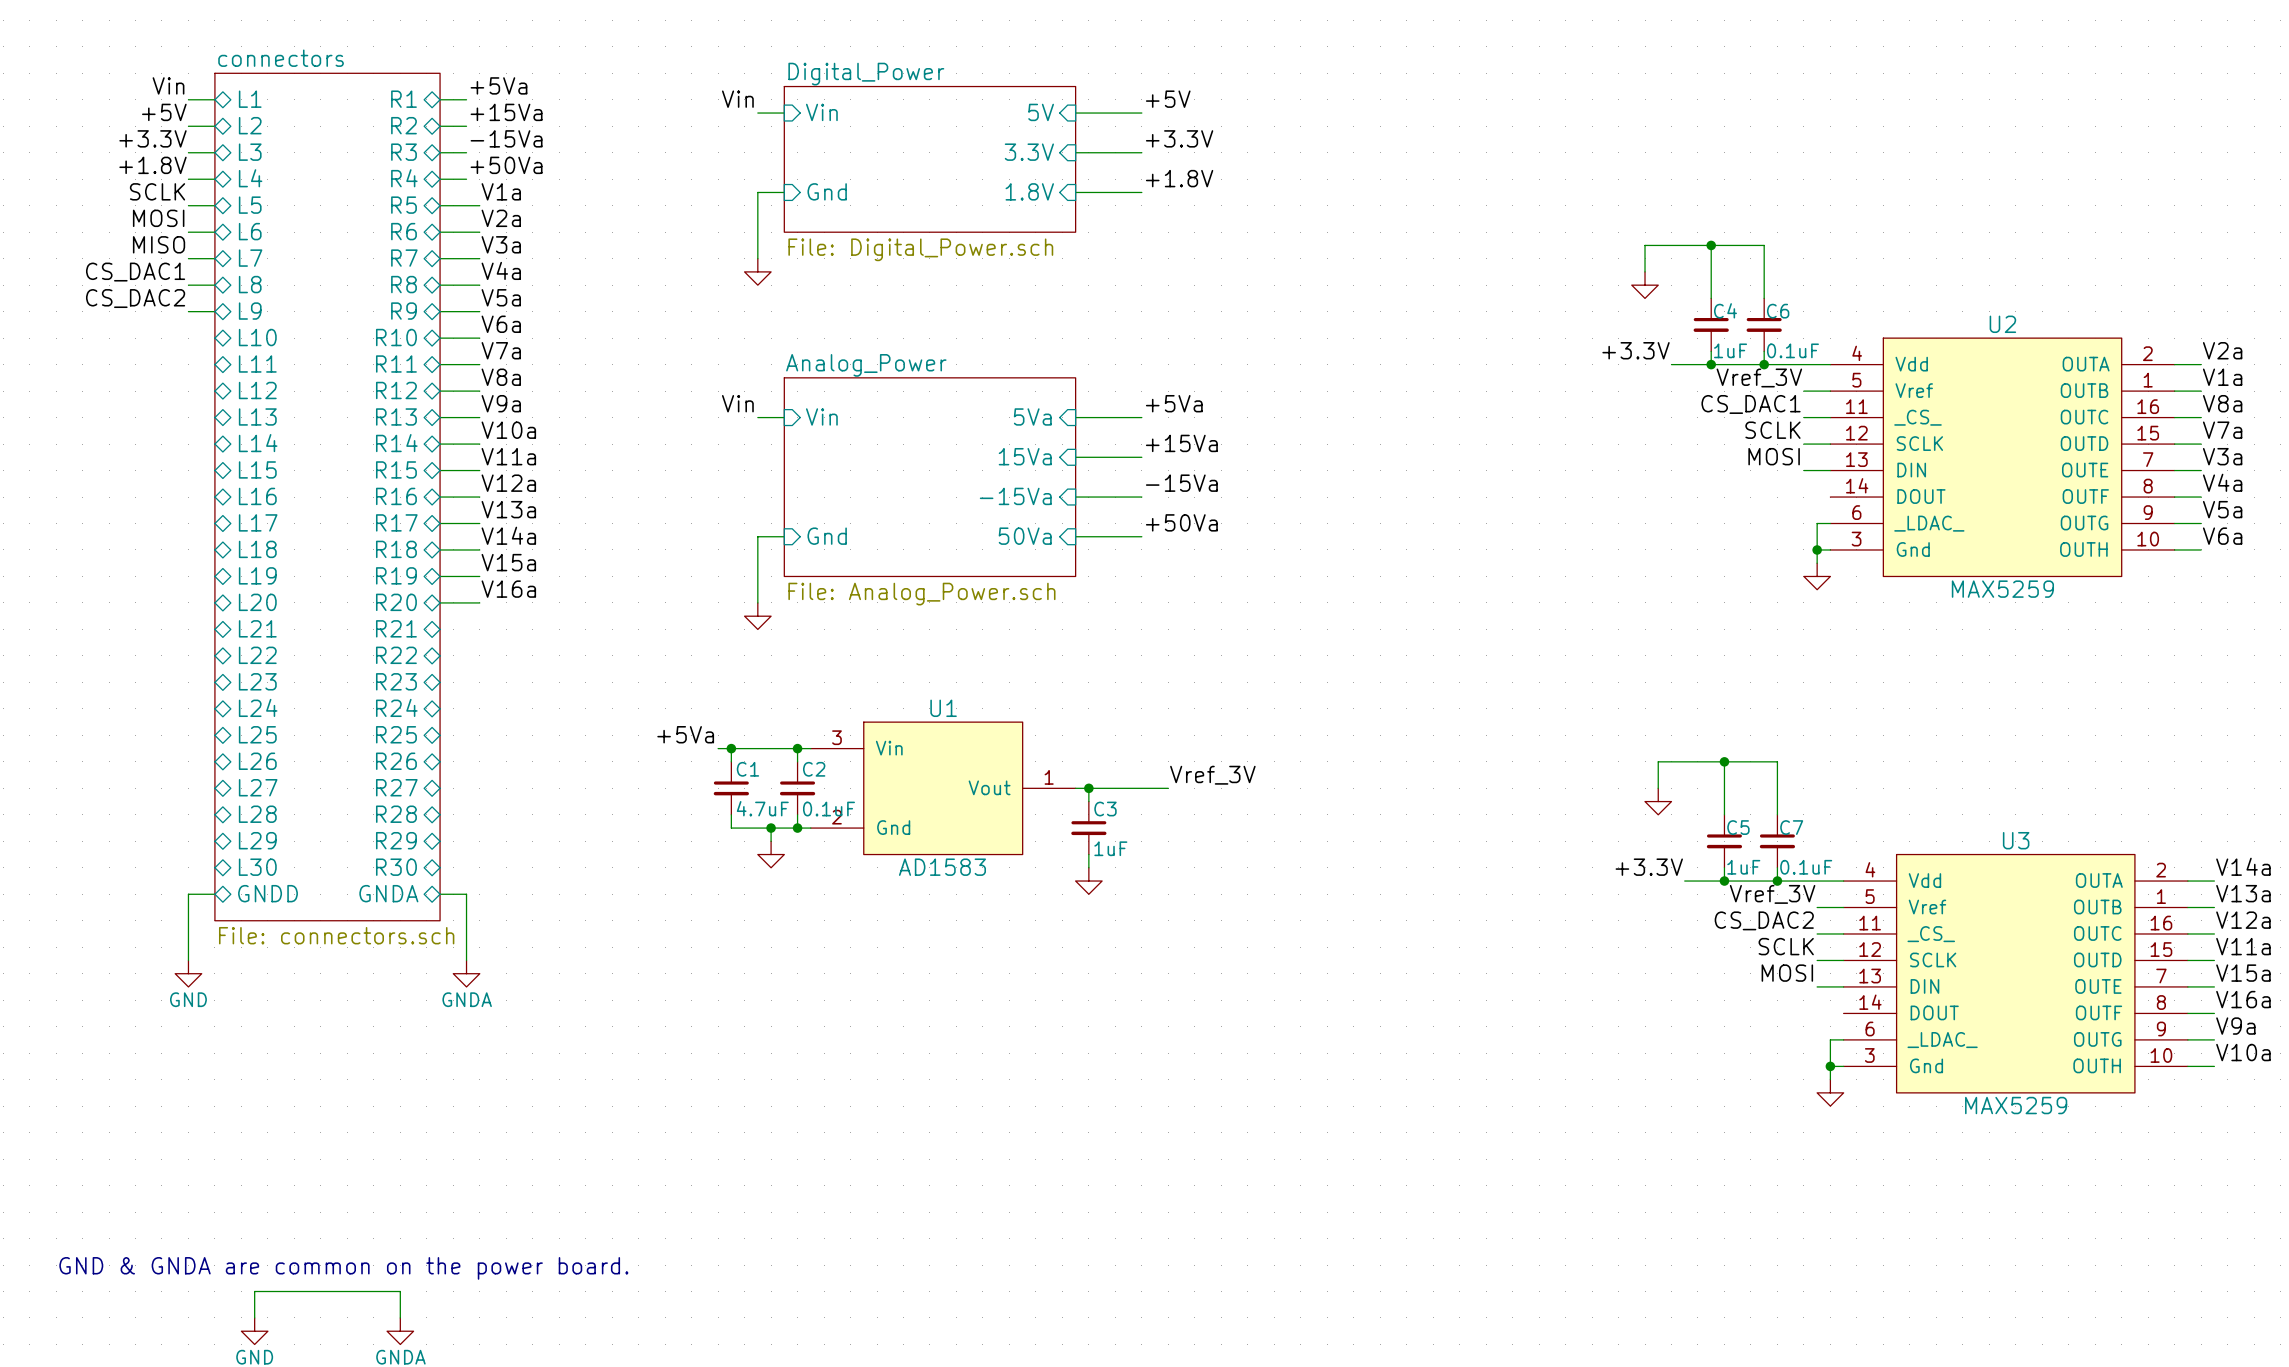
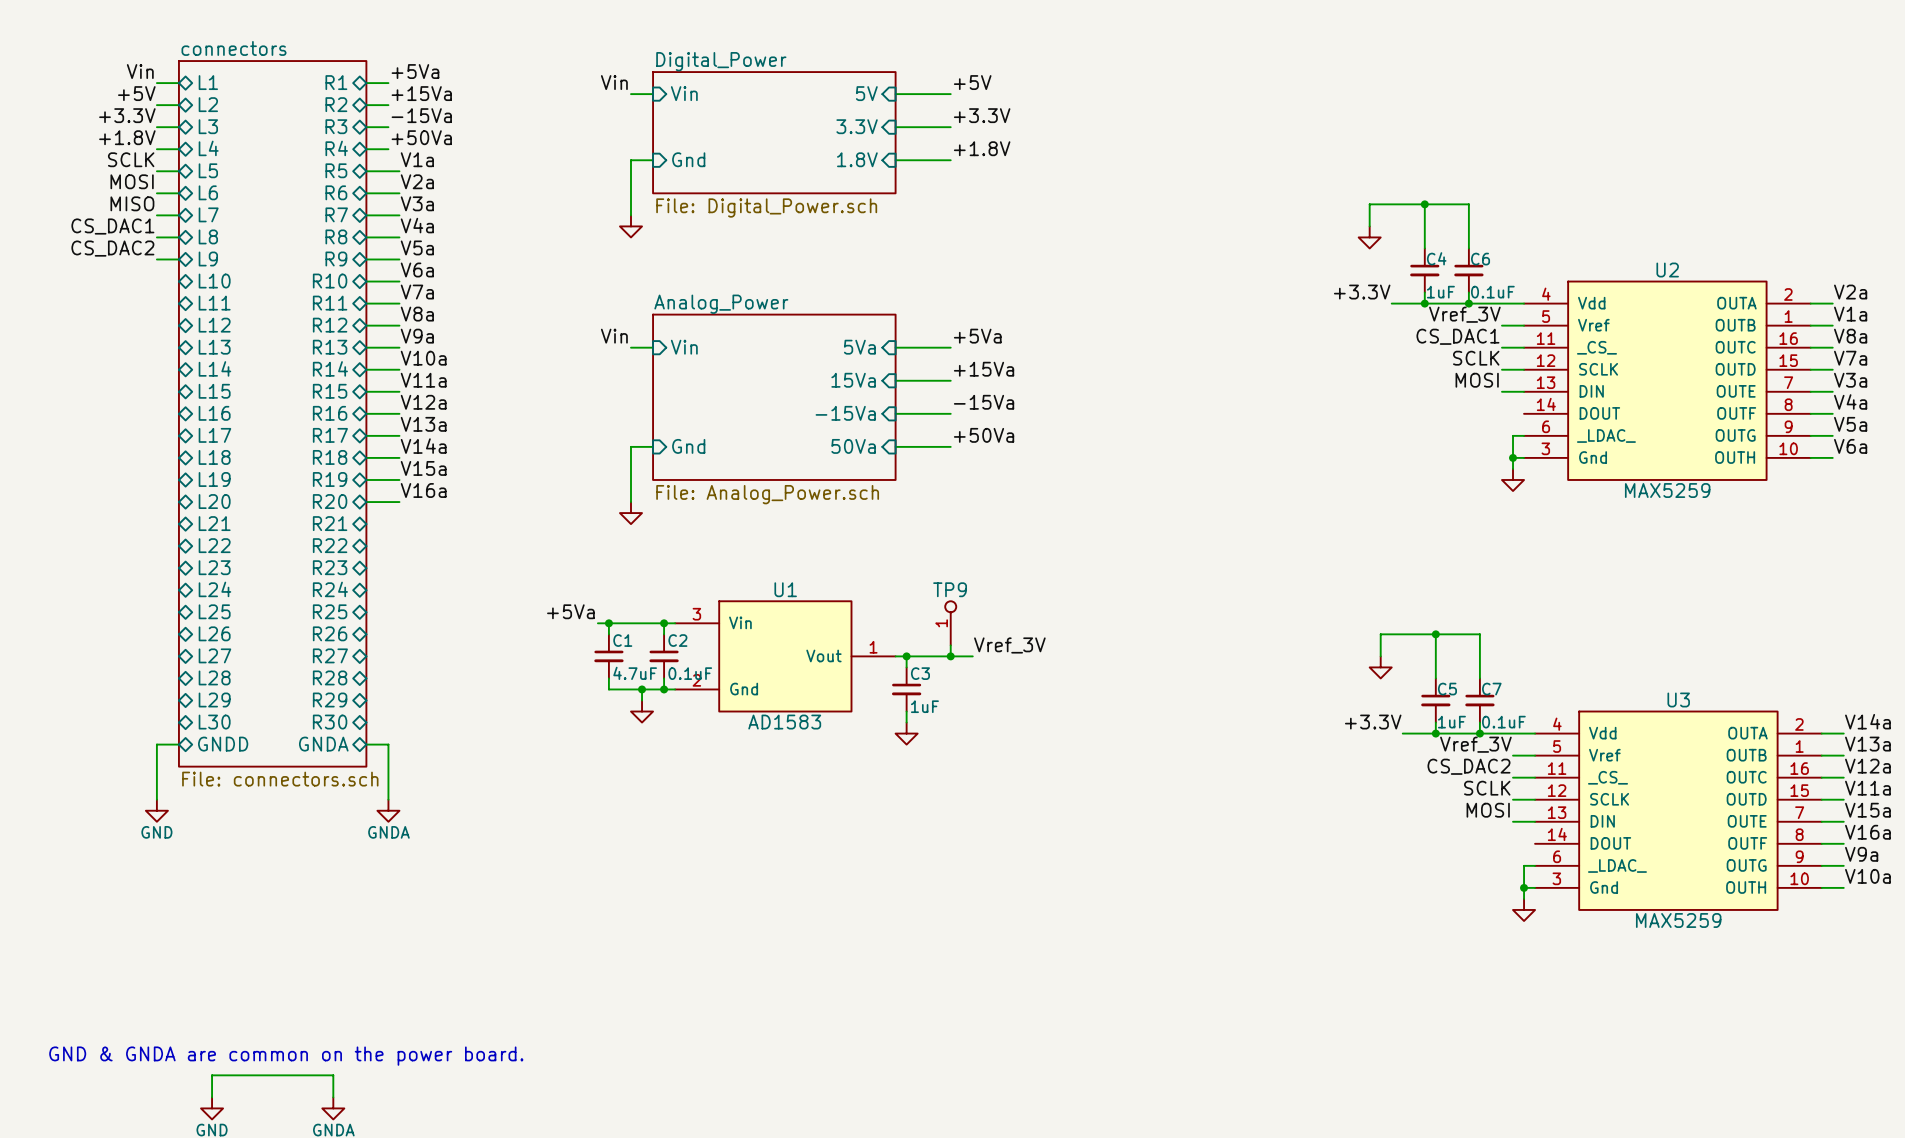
TP9: none -> (950, 623)
wire: none -> (950, 645) (950, 656)
junction: none -> (950, 656)

